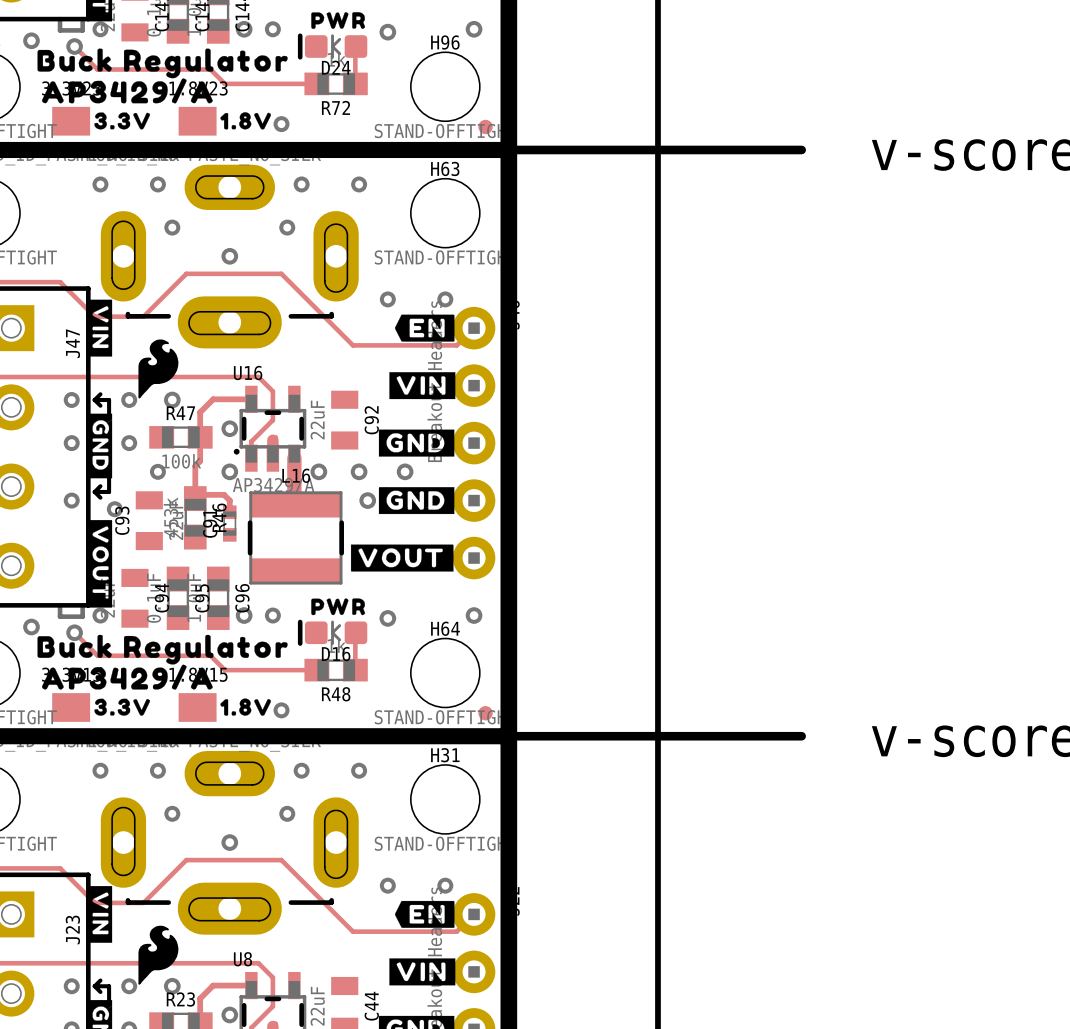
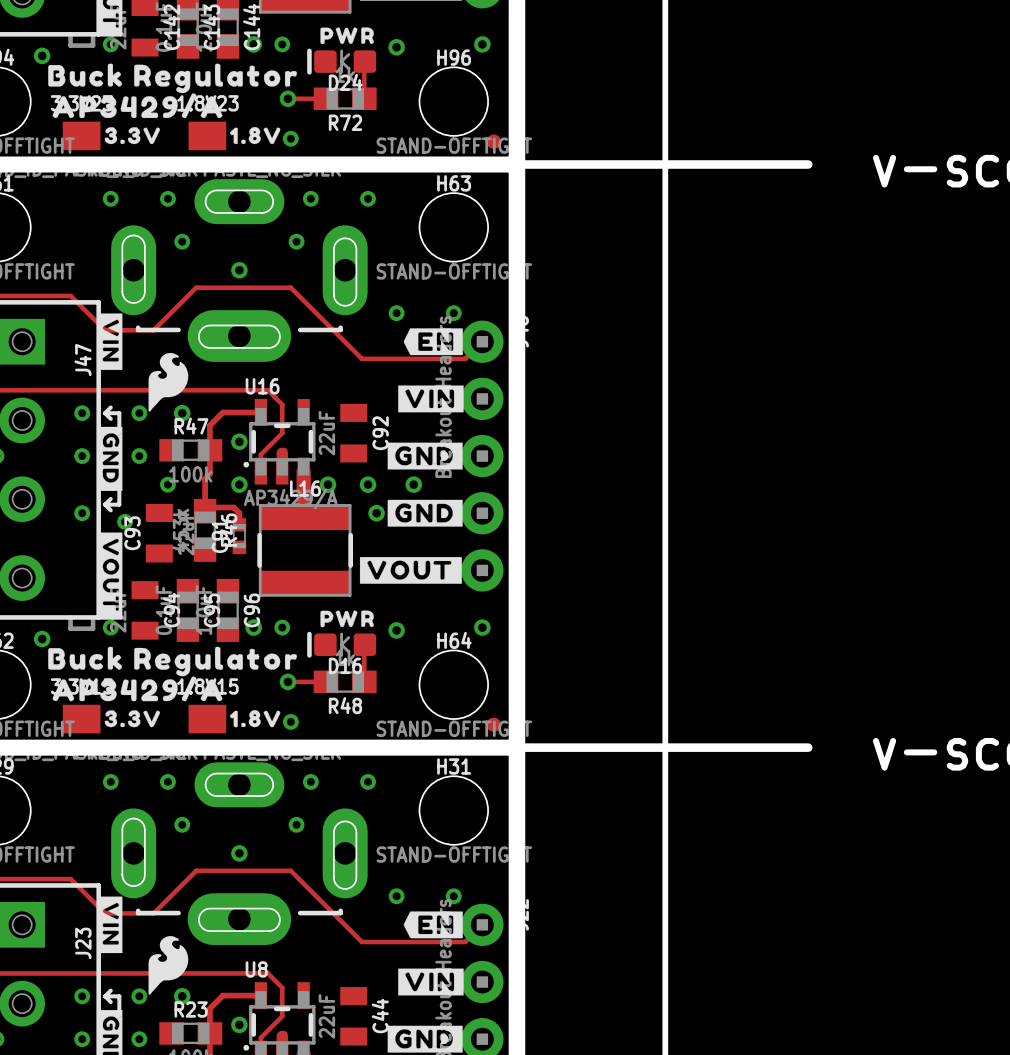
track: (74, 46) (97, 69) (210, 69) (224, 83) (278, 83) -> none
via: (74, 46) -> none
via: none -> (288, 98)
track: (74, 632) (97, 655) (210, 655) (224, 670) (278, 670) -> none
via: (74, 632) -> none
via: none -> (288, 681)

